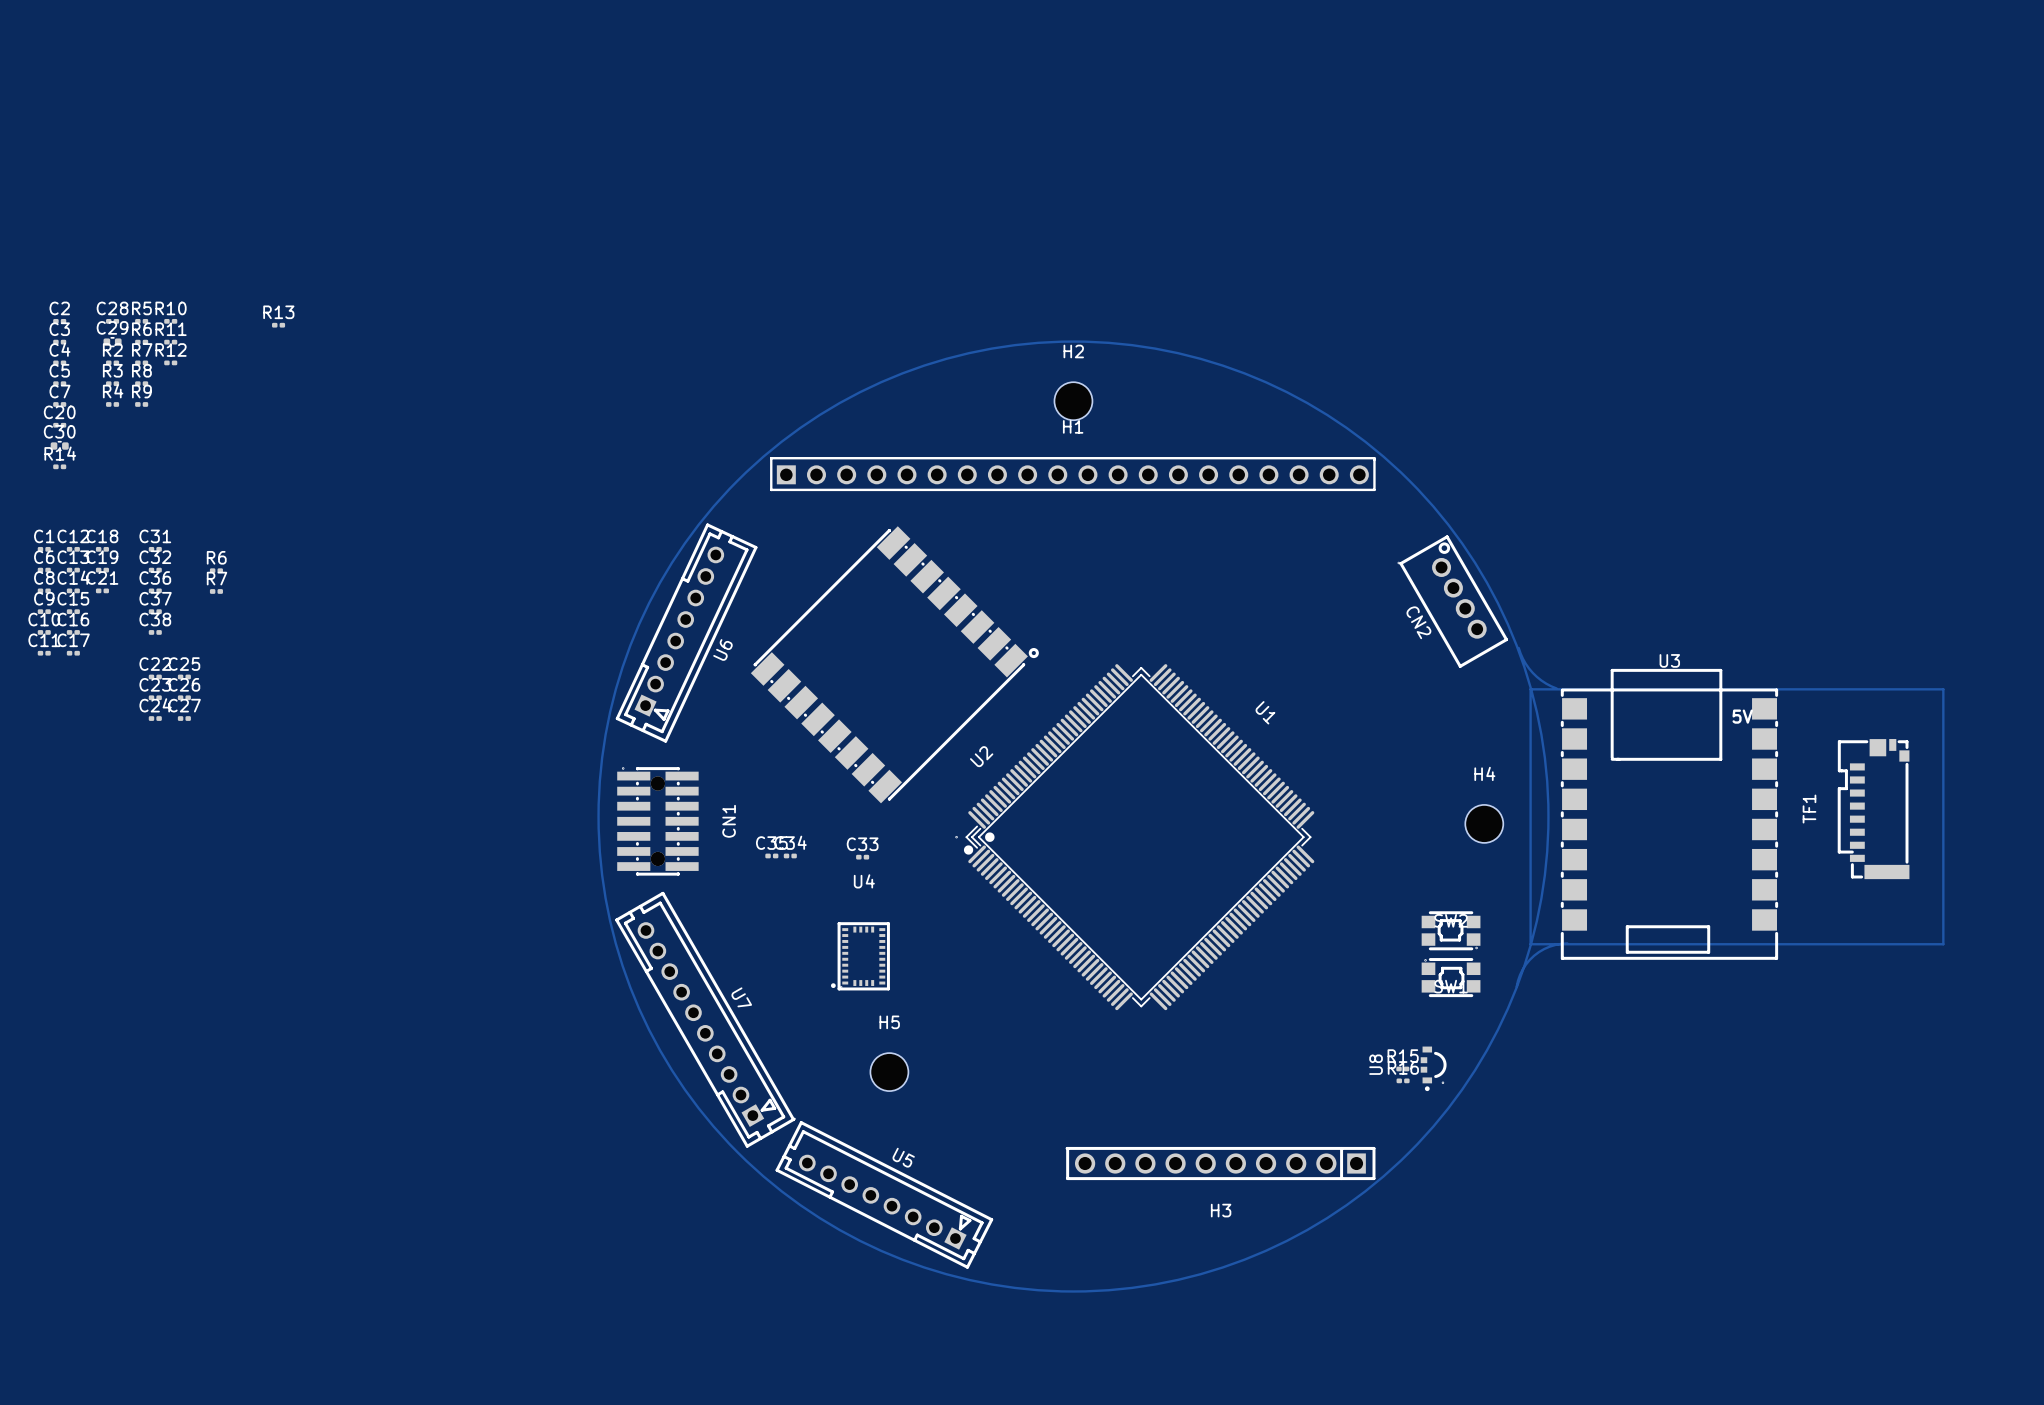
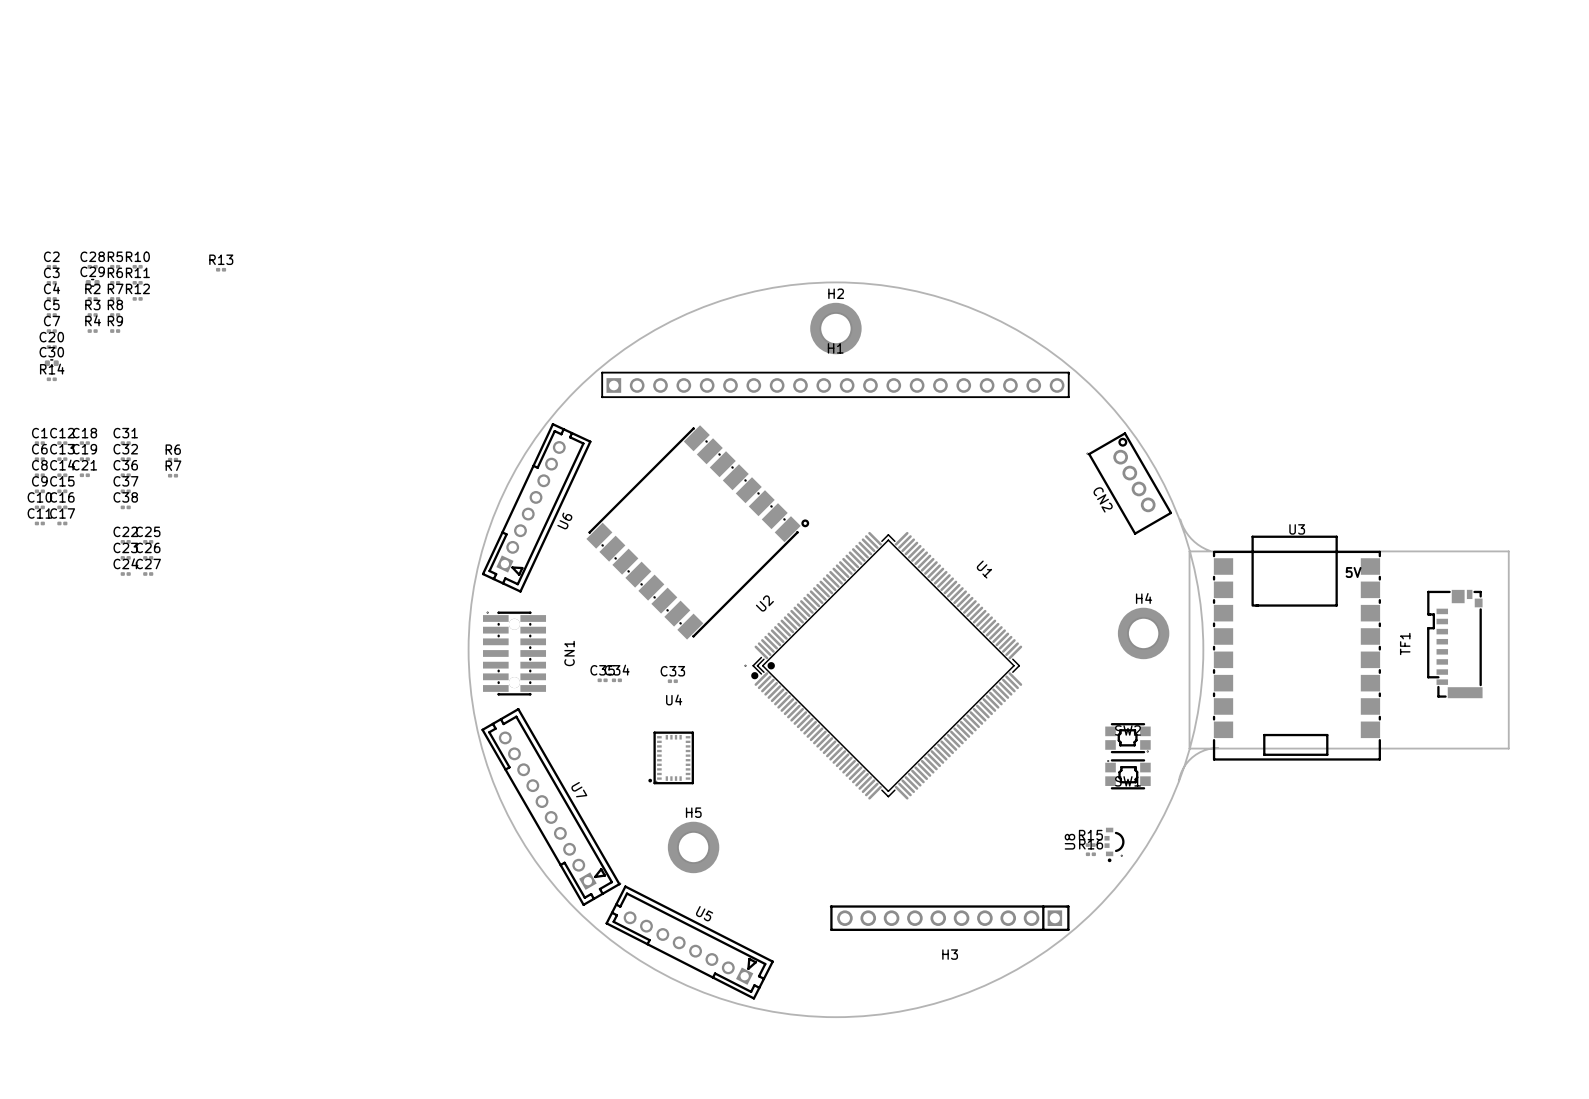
H2 footprint: [1054, 382, 1093, 421] -> [810, 302, 862, 355]
H4 footprint: [1465, 804, 1504, 843] -> [1117, 607, 1170, 660]
H5 footprint: [870, 1053, 909, 1092] -> [667, 821, 720, 874]

